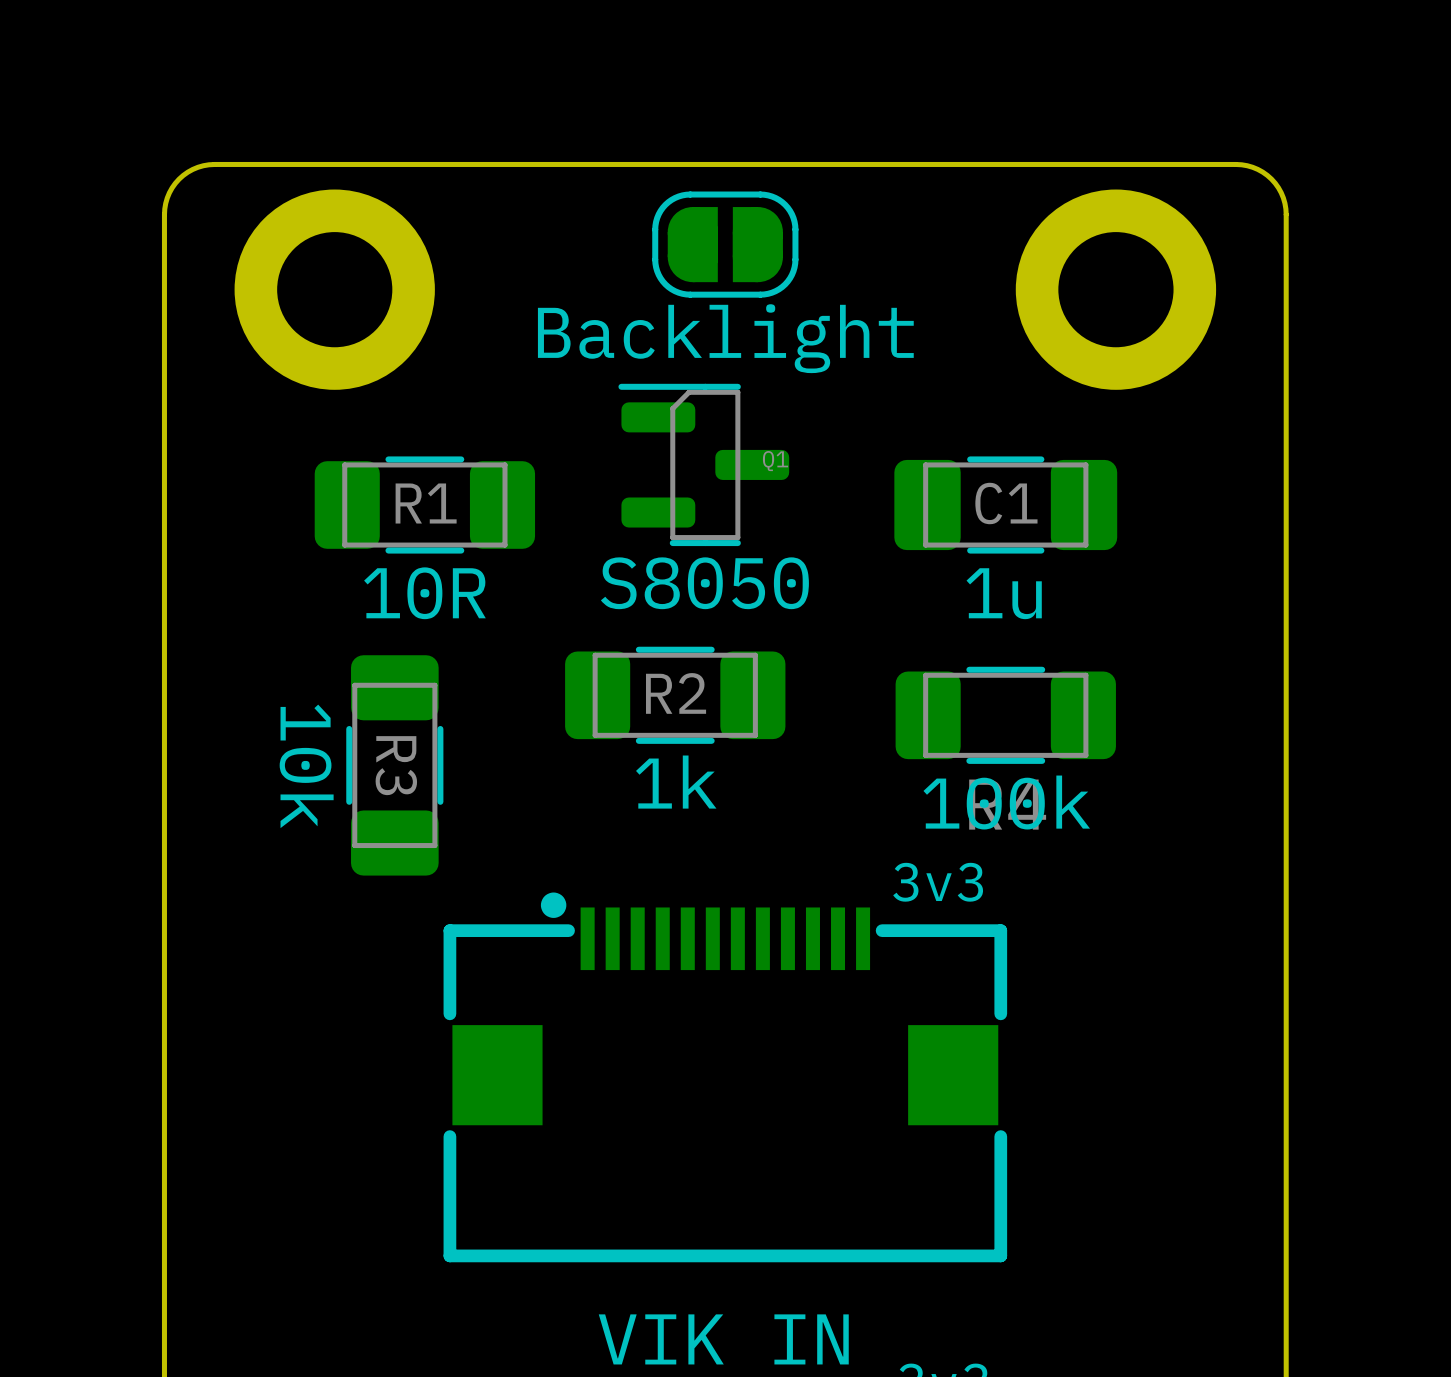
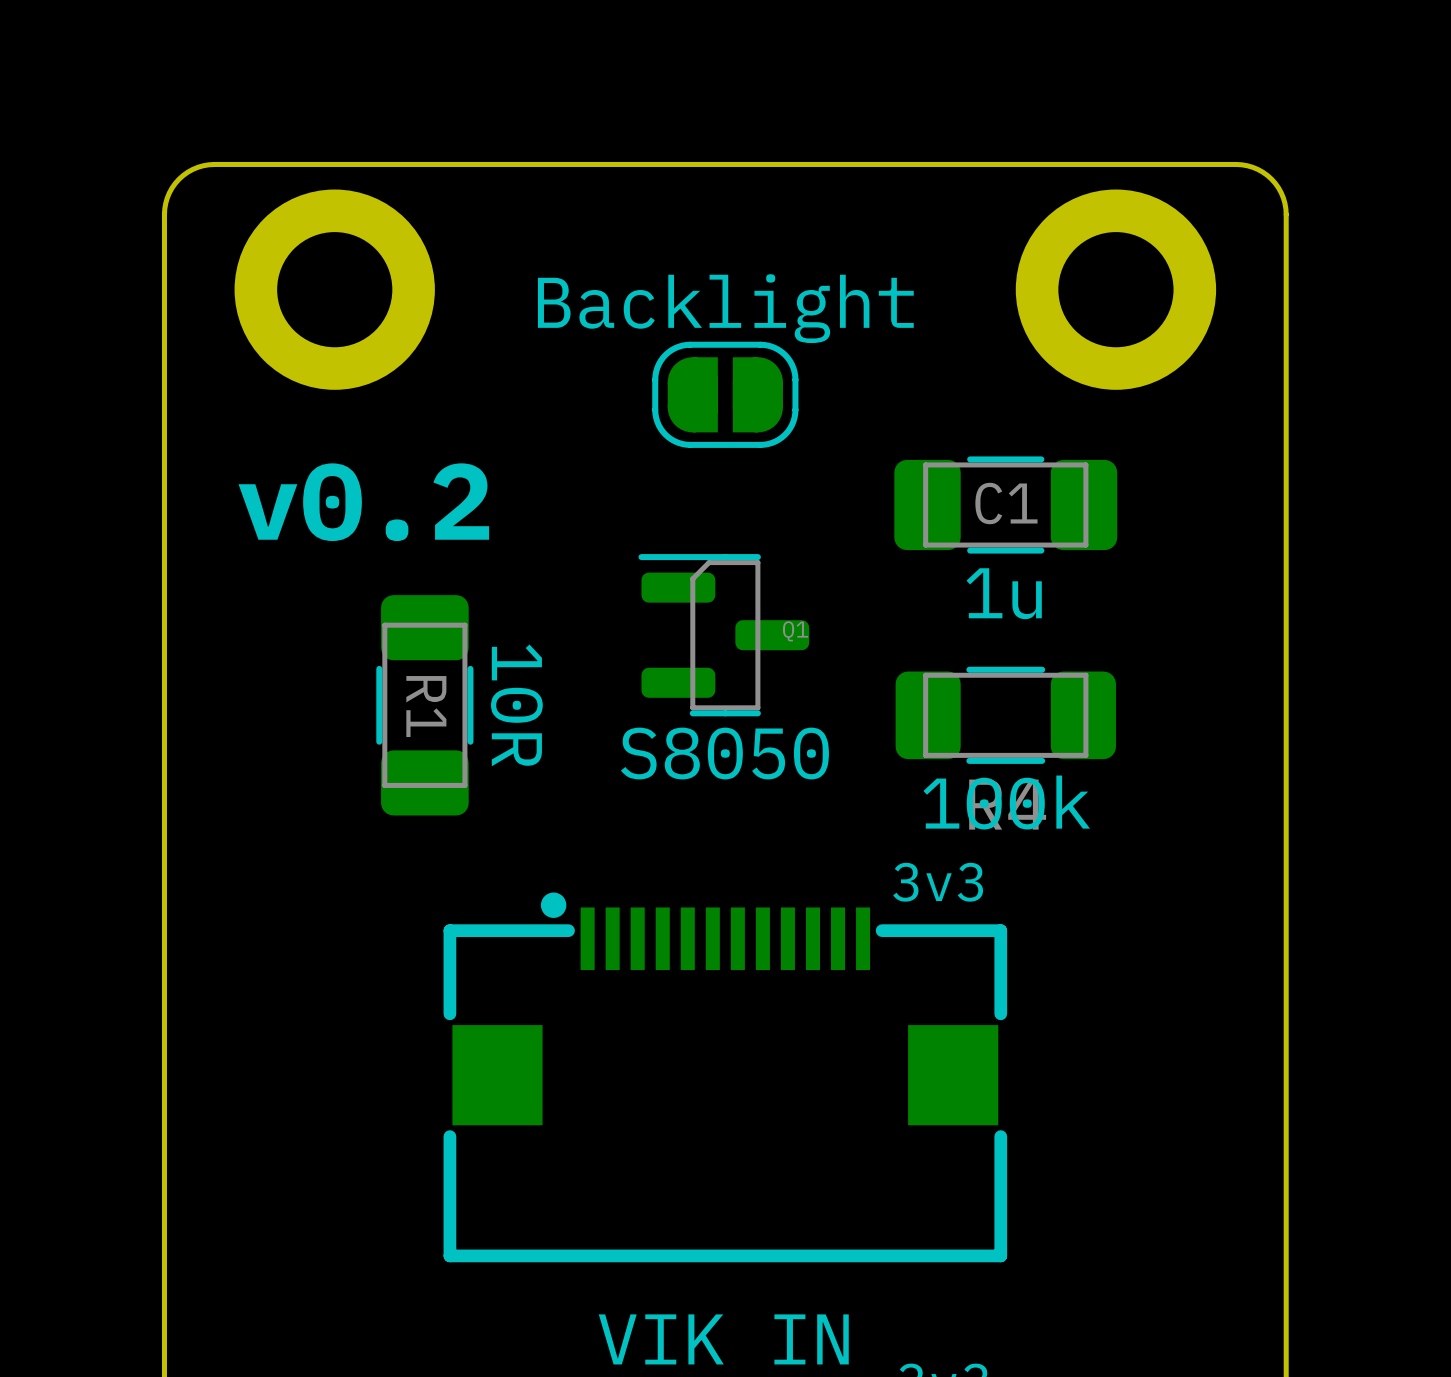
part position: (725, 244) -> (725, 394)
part value position: Backlight (725, 338) -> Backlight (725, 308)
Q1 position: (703, 464) -> (723, 635)
text: none -> v0.2 (363, 502)
R1 rotation: 0° (424, 505) -> 90° clockwise (424, 705)
R1 position: (424, 505) -> (424, 705)
R1 value position: 10R (424, 593) -> 10R (516, 705)
R2: 1k (675, 695) -> none
R3: 10k (394, 765) -> none

